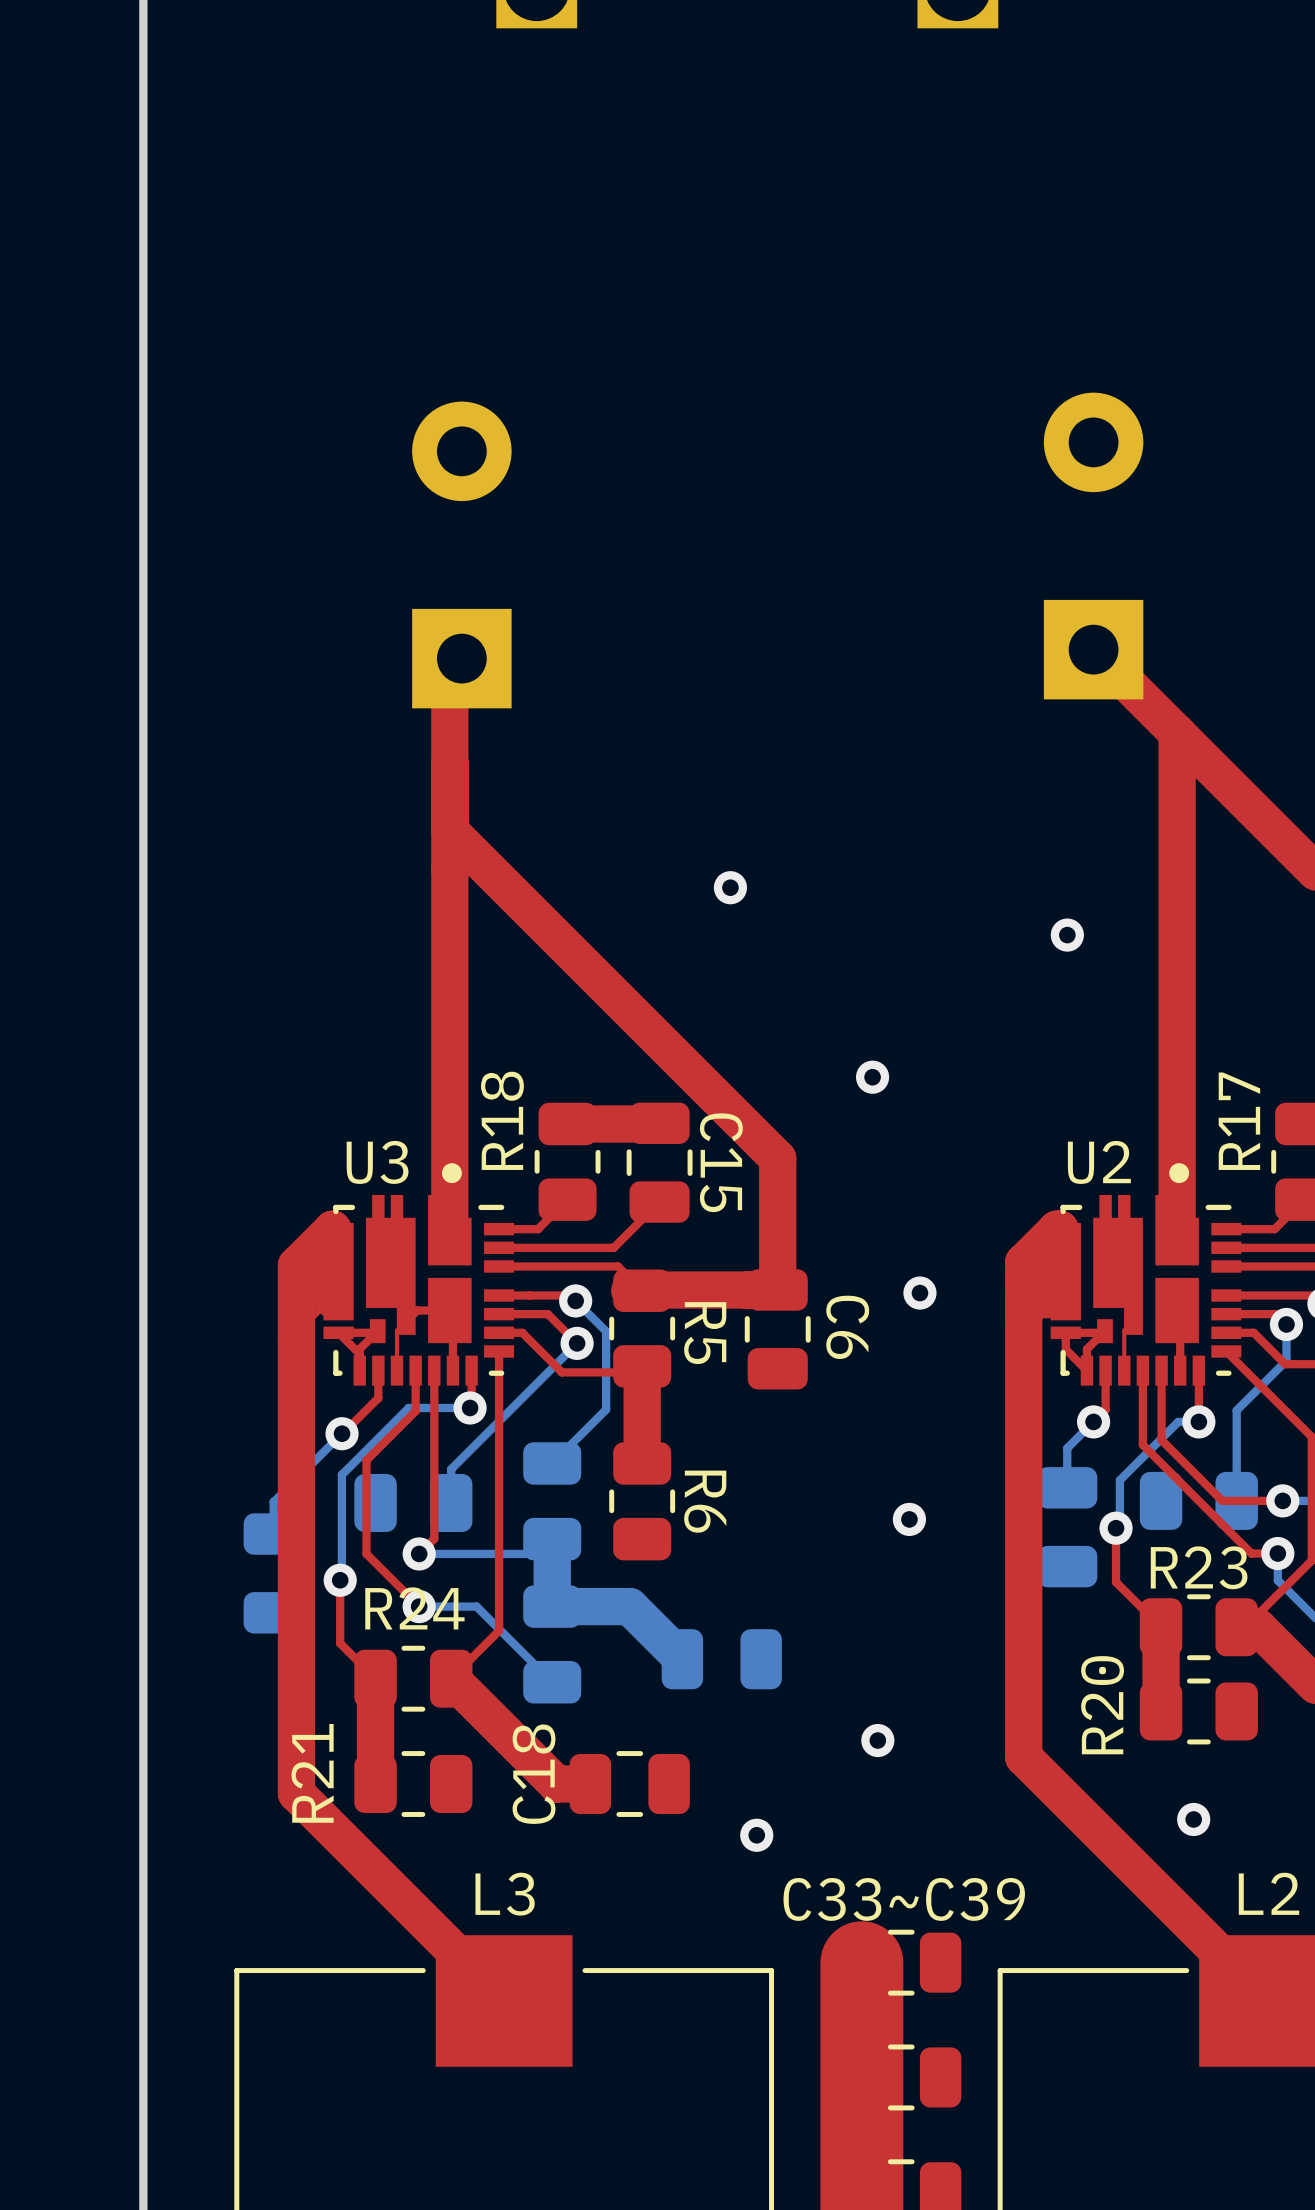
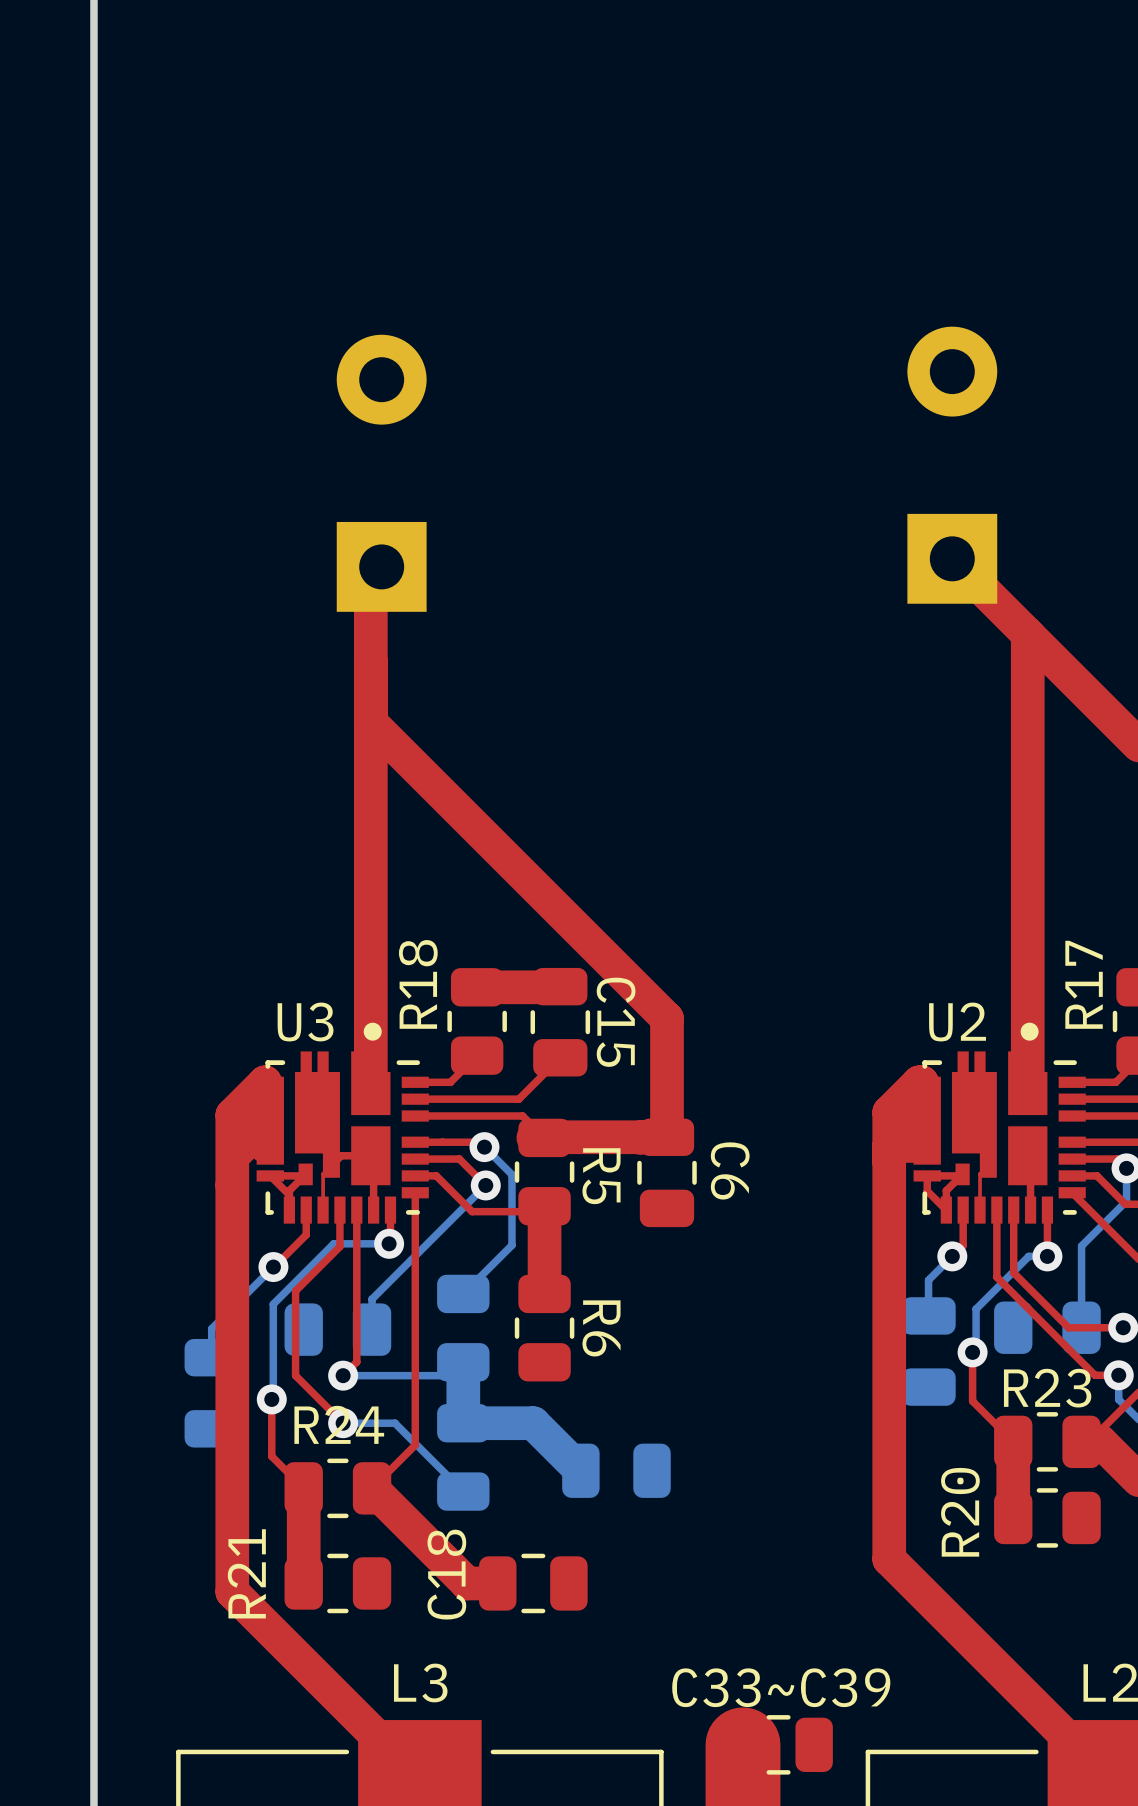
via: (730, 887) -> none
via: (1067, 935) -> none
via: (872, 1077) -> none
via: (919, 1293) -> none
via: (909, 1519) -> none
via: (877, 1740) -> none
via: (1193, 1819) -> none
via: (756, 1835) -> none

